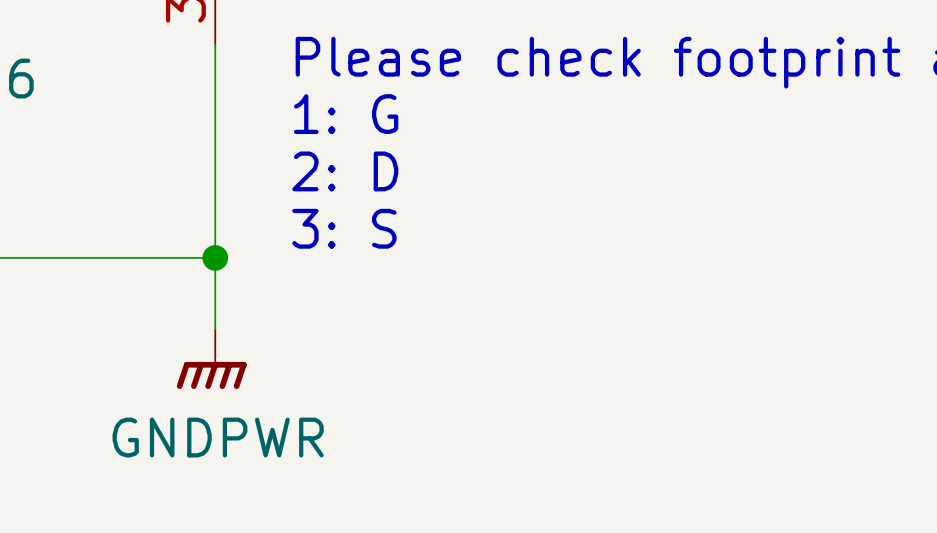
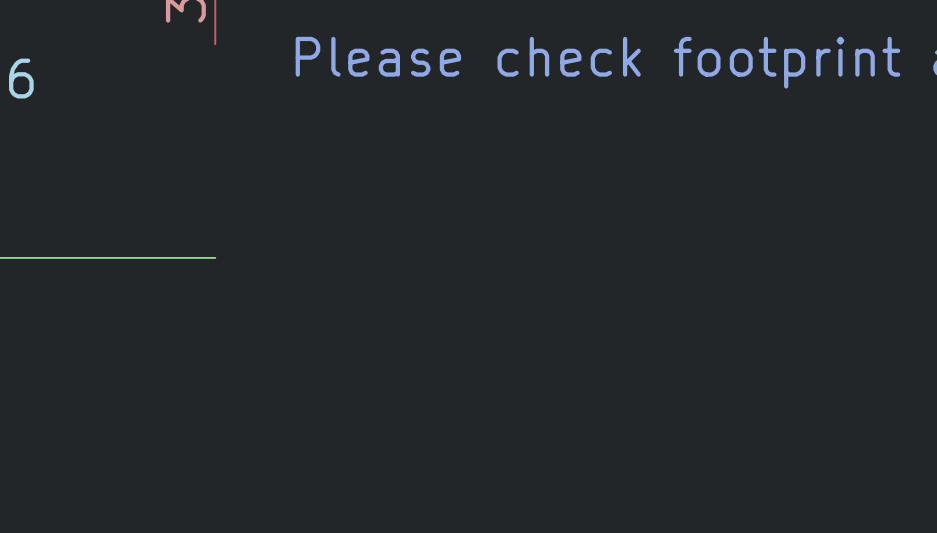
wire: (215, 44) (215, 329) -> none
text: 1: G (346, 114) -> none
text: 2: D (345, 171) -> none
text: 3: S (344, 228) -> none
junction: (215, 257) -> none
power symbol: GNDPWR (211, 359) -> none

